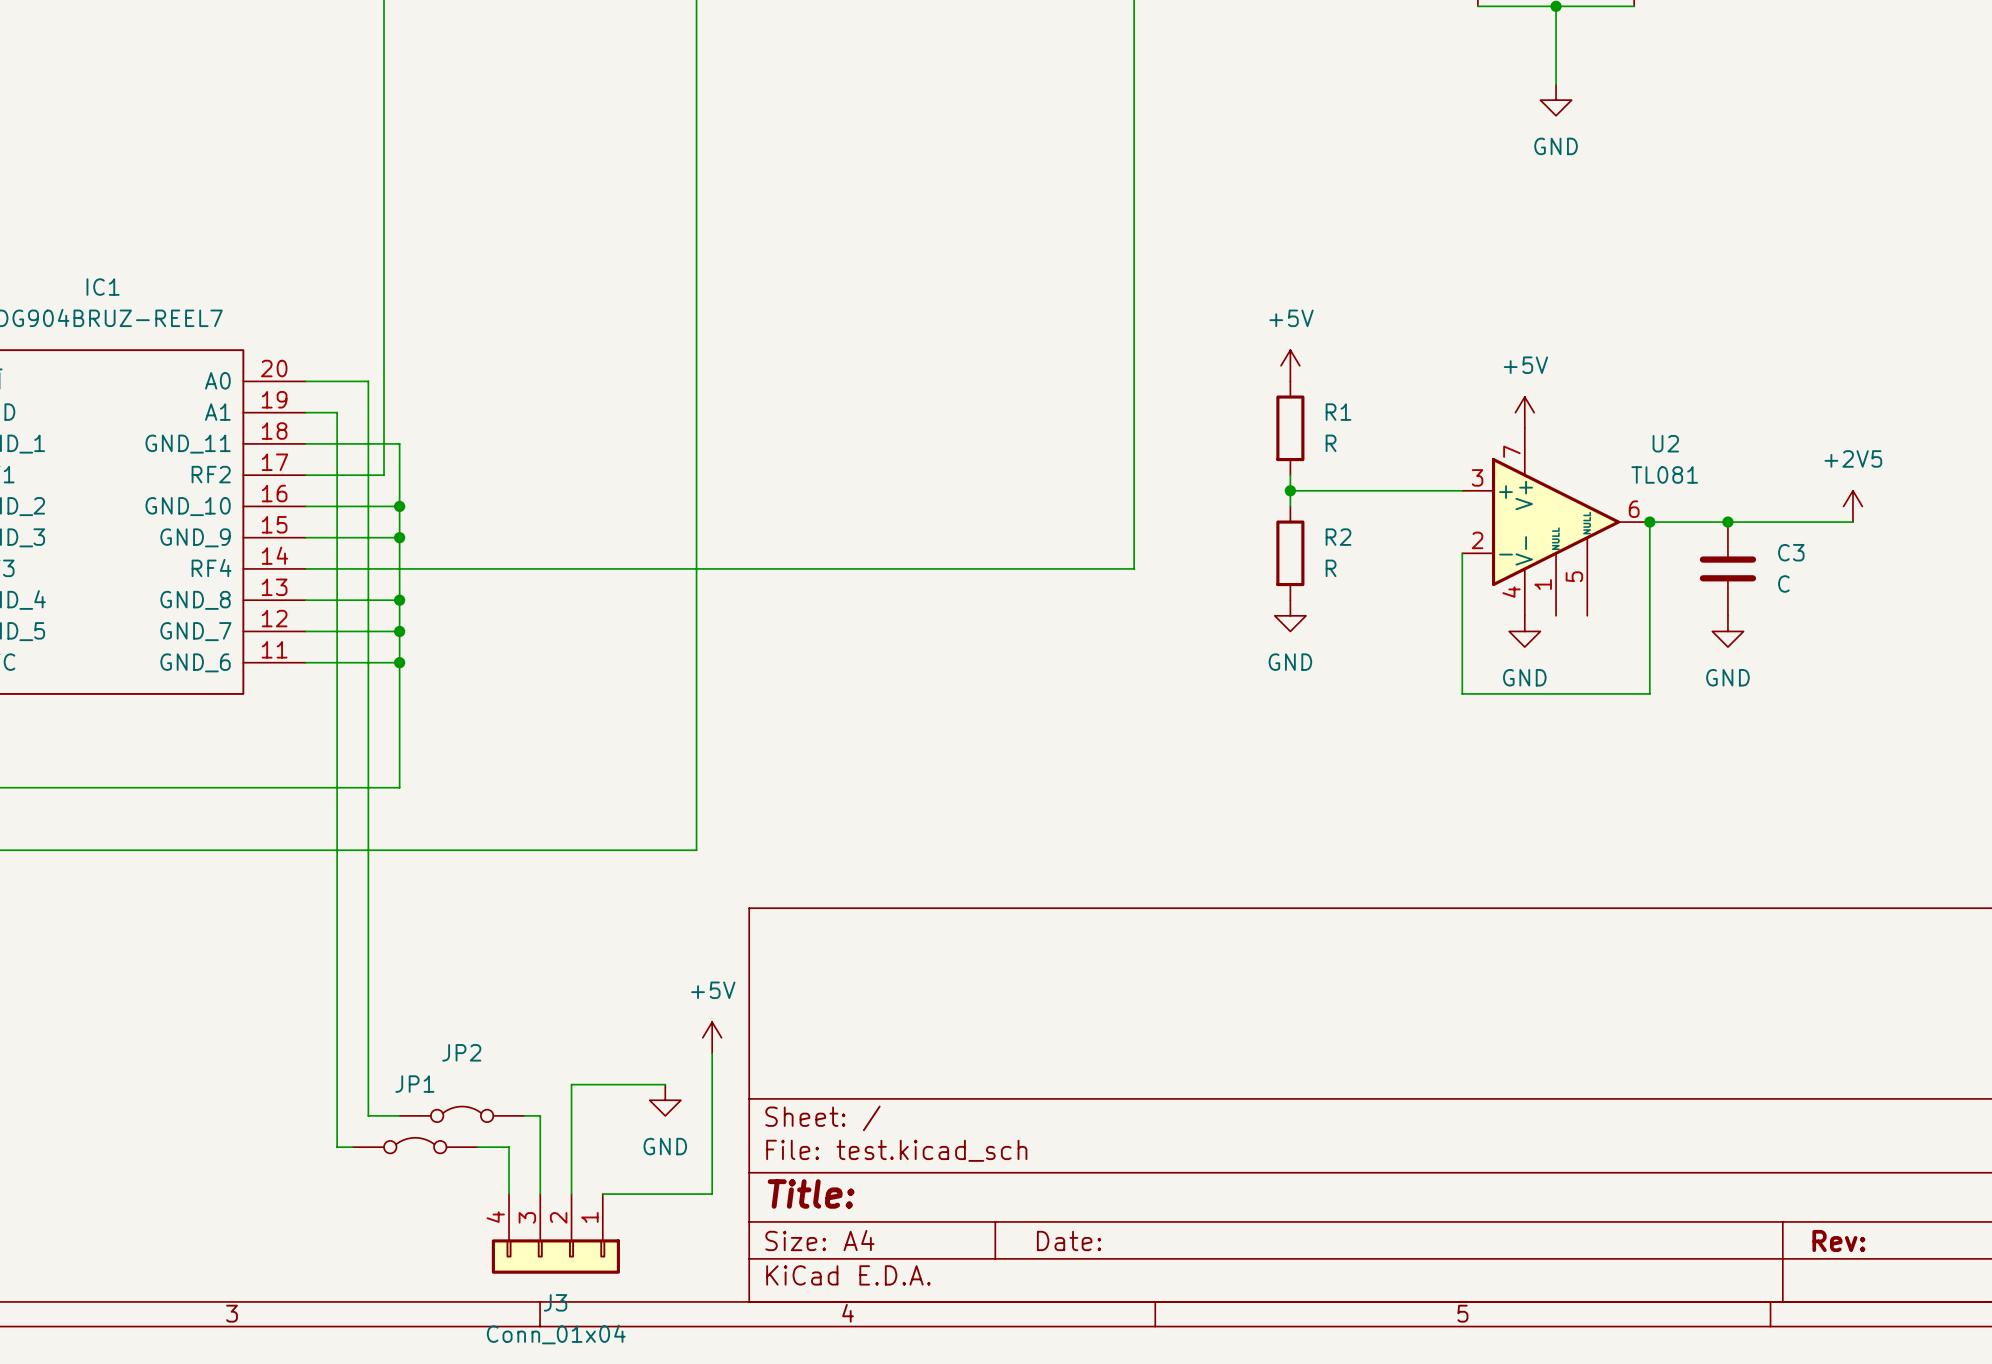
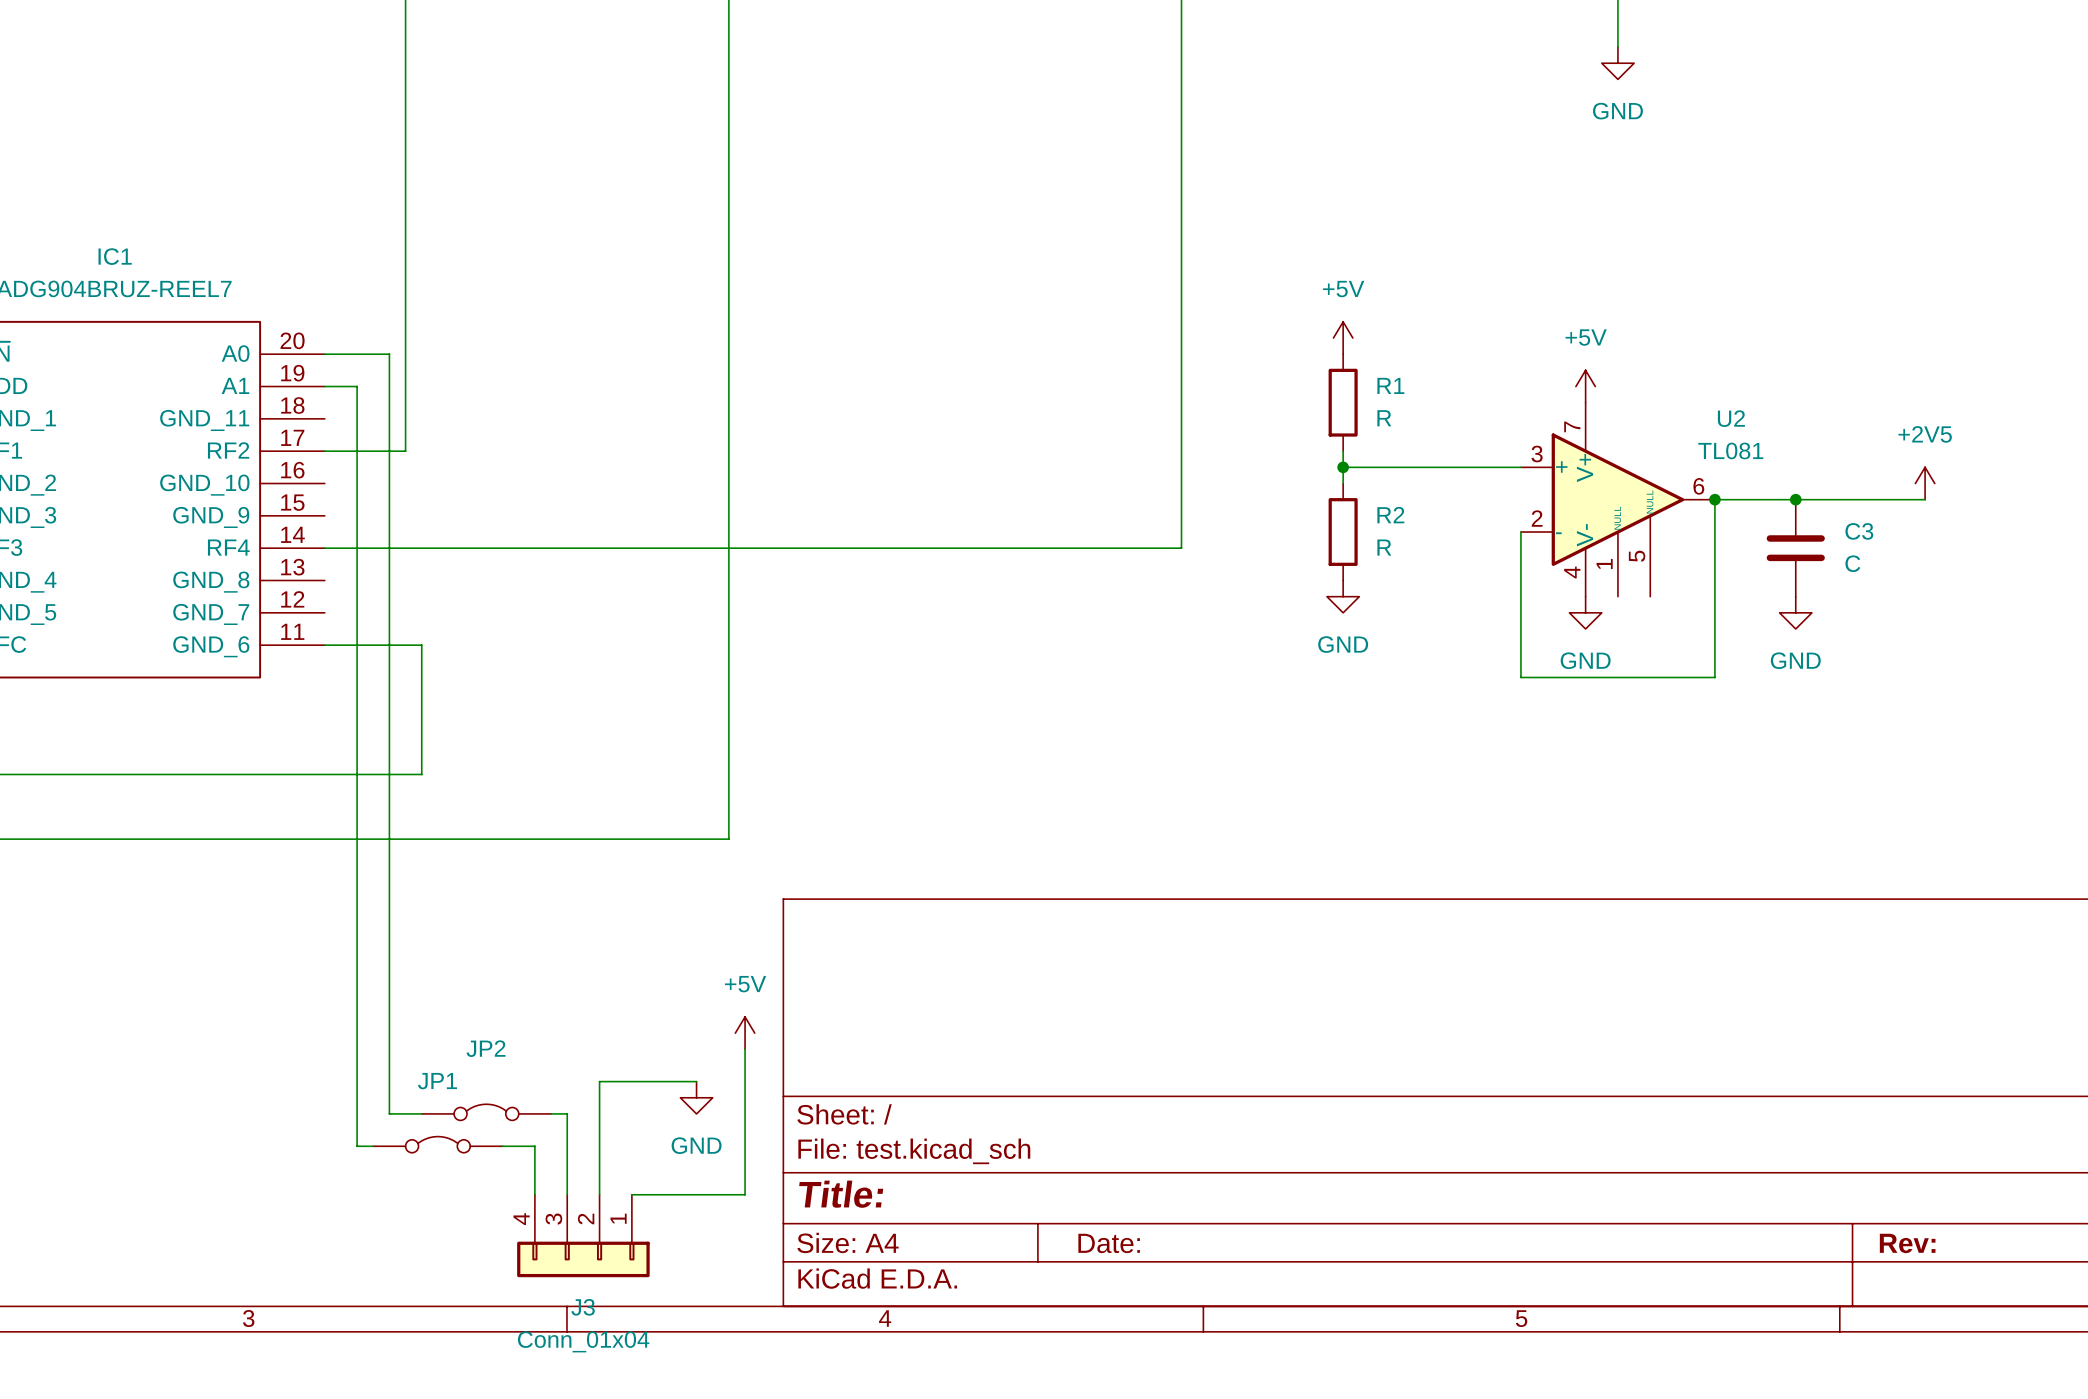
wire: (305, 443) (399, 443) (399, 662) -> none
wire: (305, 506) (399, 506) -> none
junction: (399, 506) -> none
wire: (305, 537) (399, 537) -> none
junction: (399, 537) -> none
wire: (305, 600) (399, 600) -> none
junction: (399, 600) -> none
wire: (305, 631) (399, 631) -> none
junction: (399, 631) -> none
junction: (399, 662) -> none

